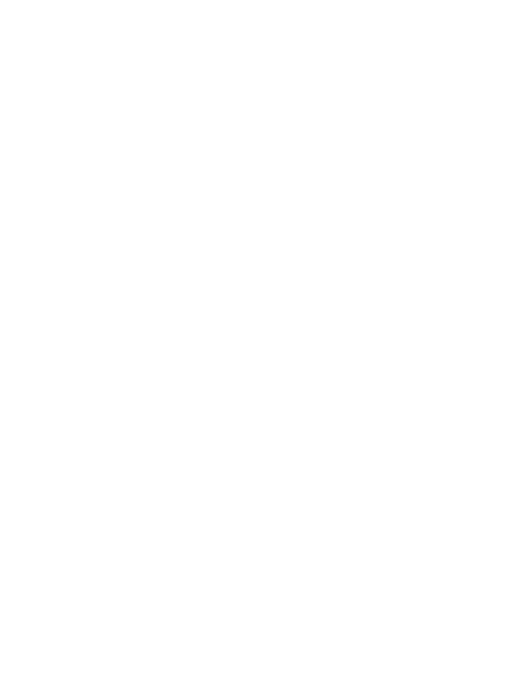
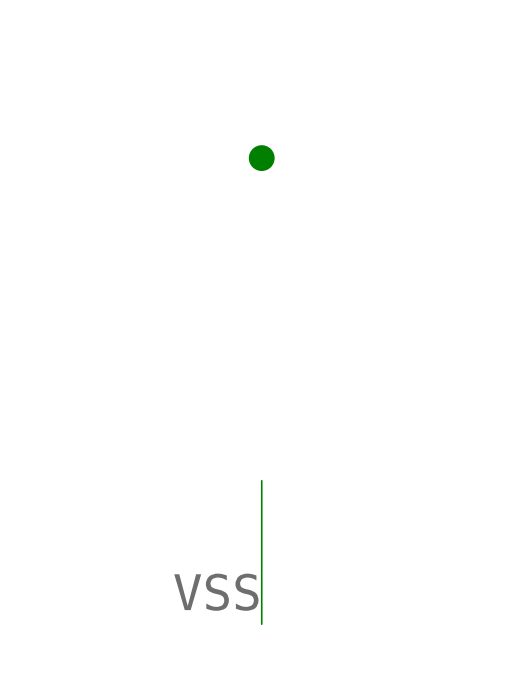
junction: none -> (261, 158)
wire: none -> (261, 480) (261, 624)
label: none -> VSS (216, 592)

